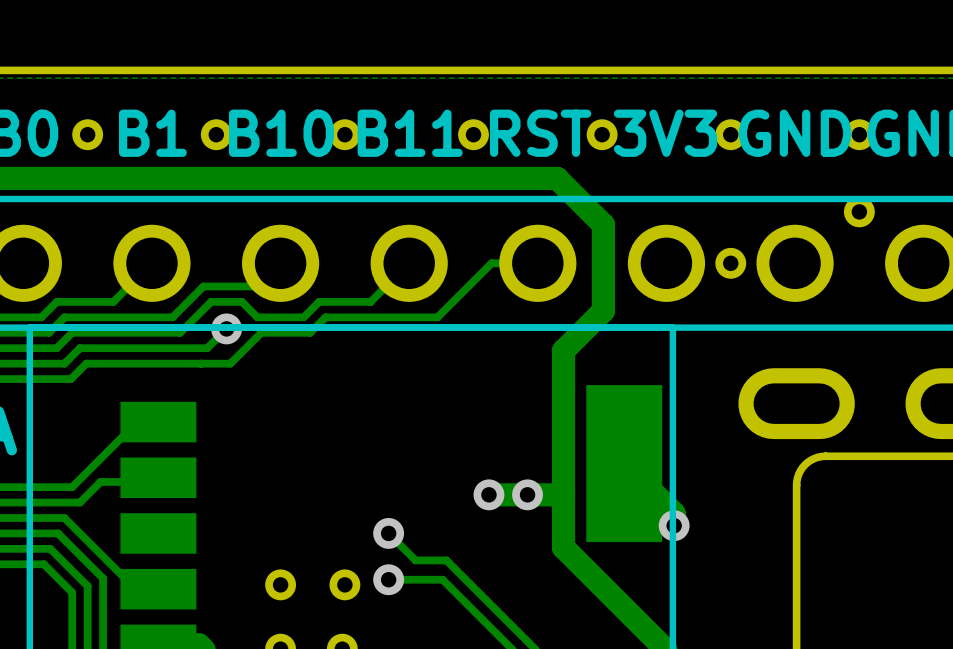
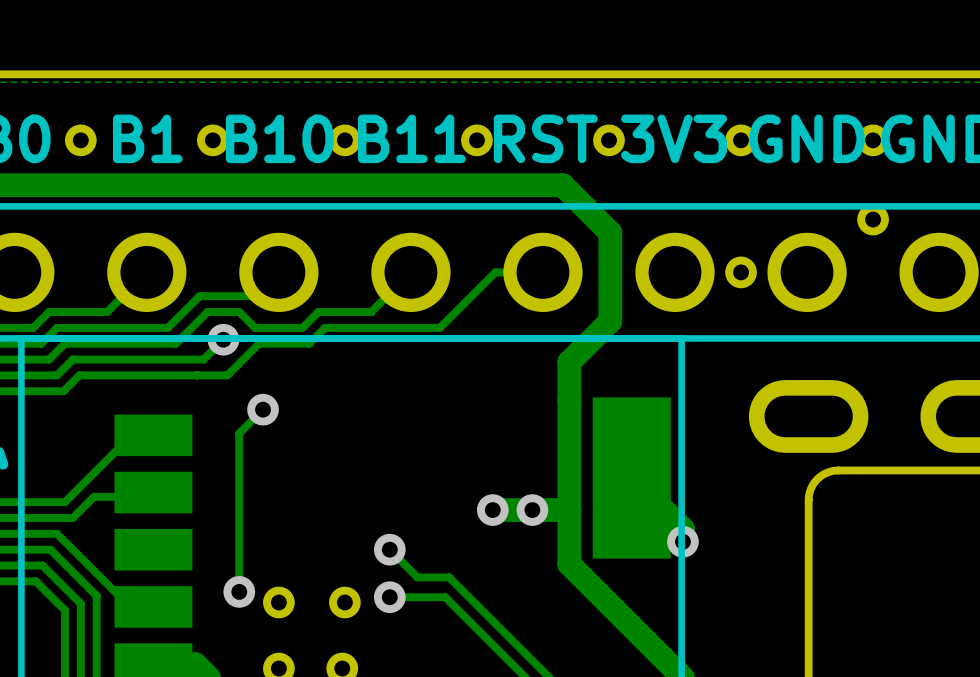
track: none -> (263, 409) (239, 433) (239, 591)
via: none -> (263, 409)
via: none -> (239, 591)

